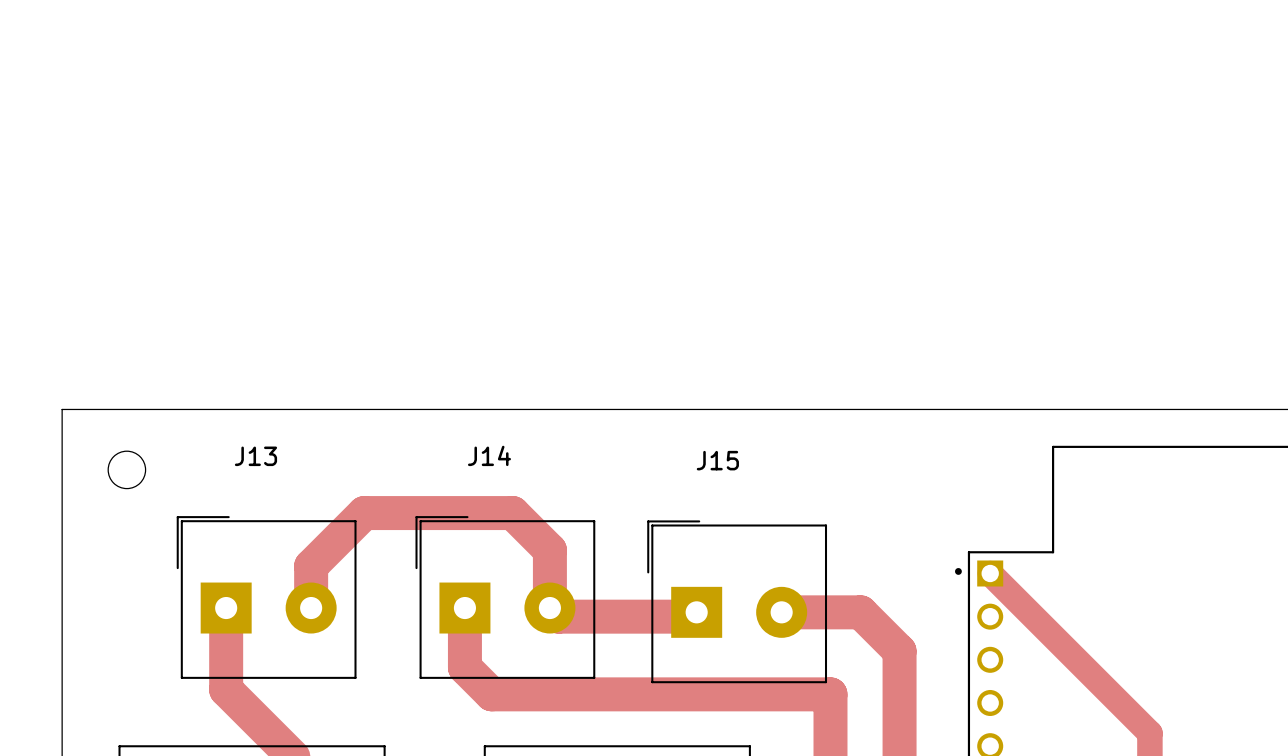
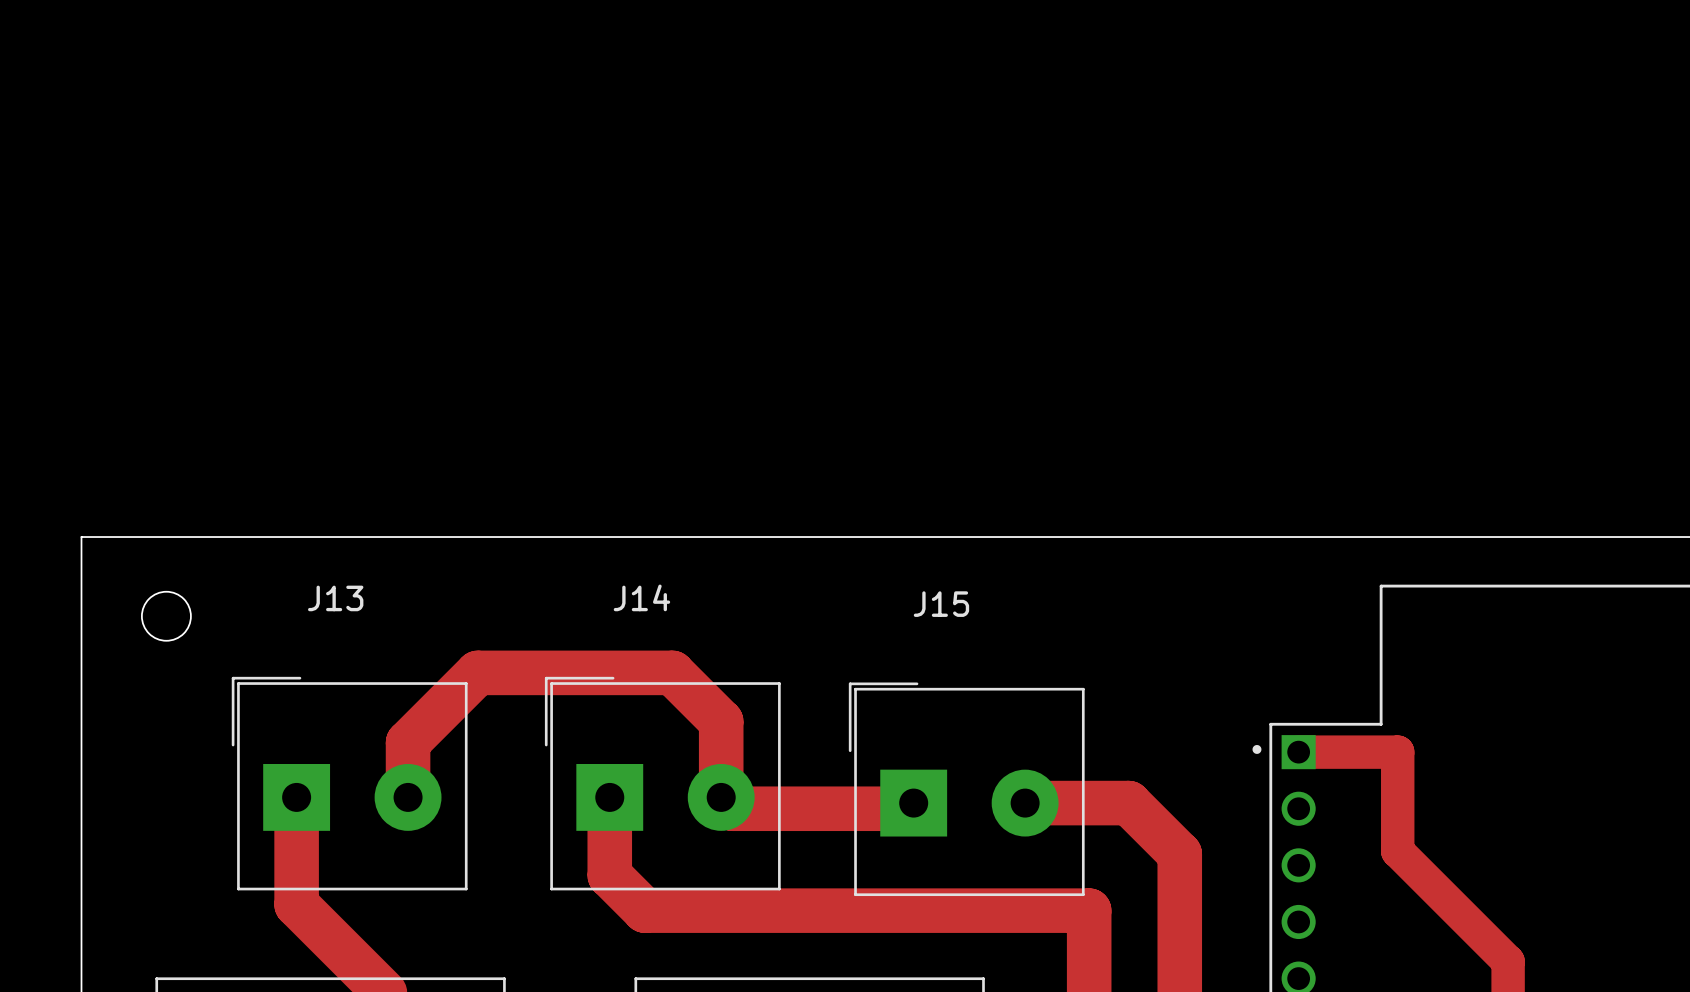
track: (990, 573) (1065, 649) -> (1298, 752) (1397, 752) (1397, 851)

